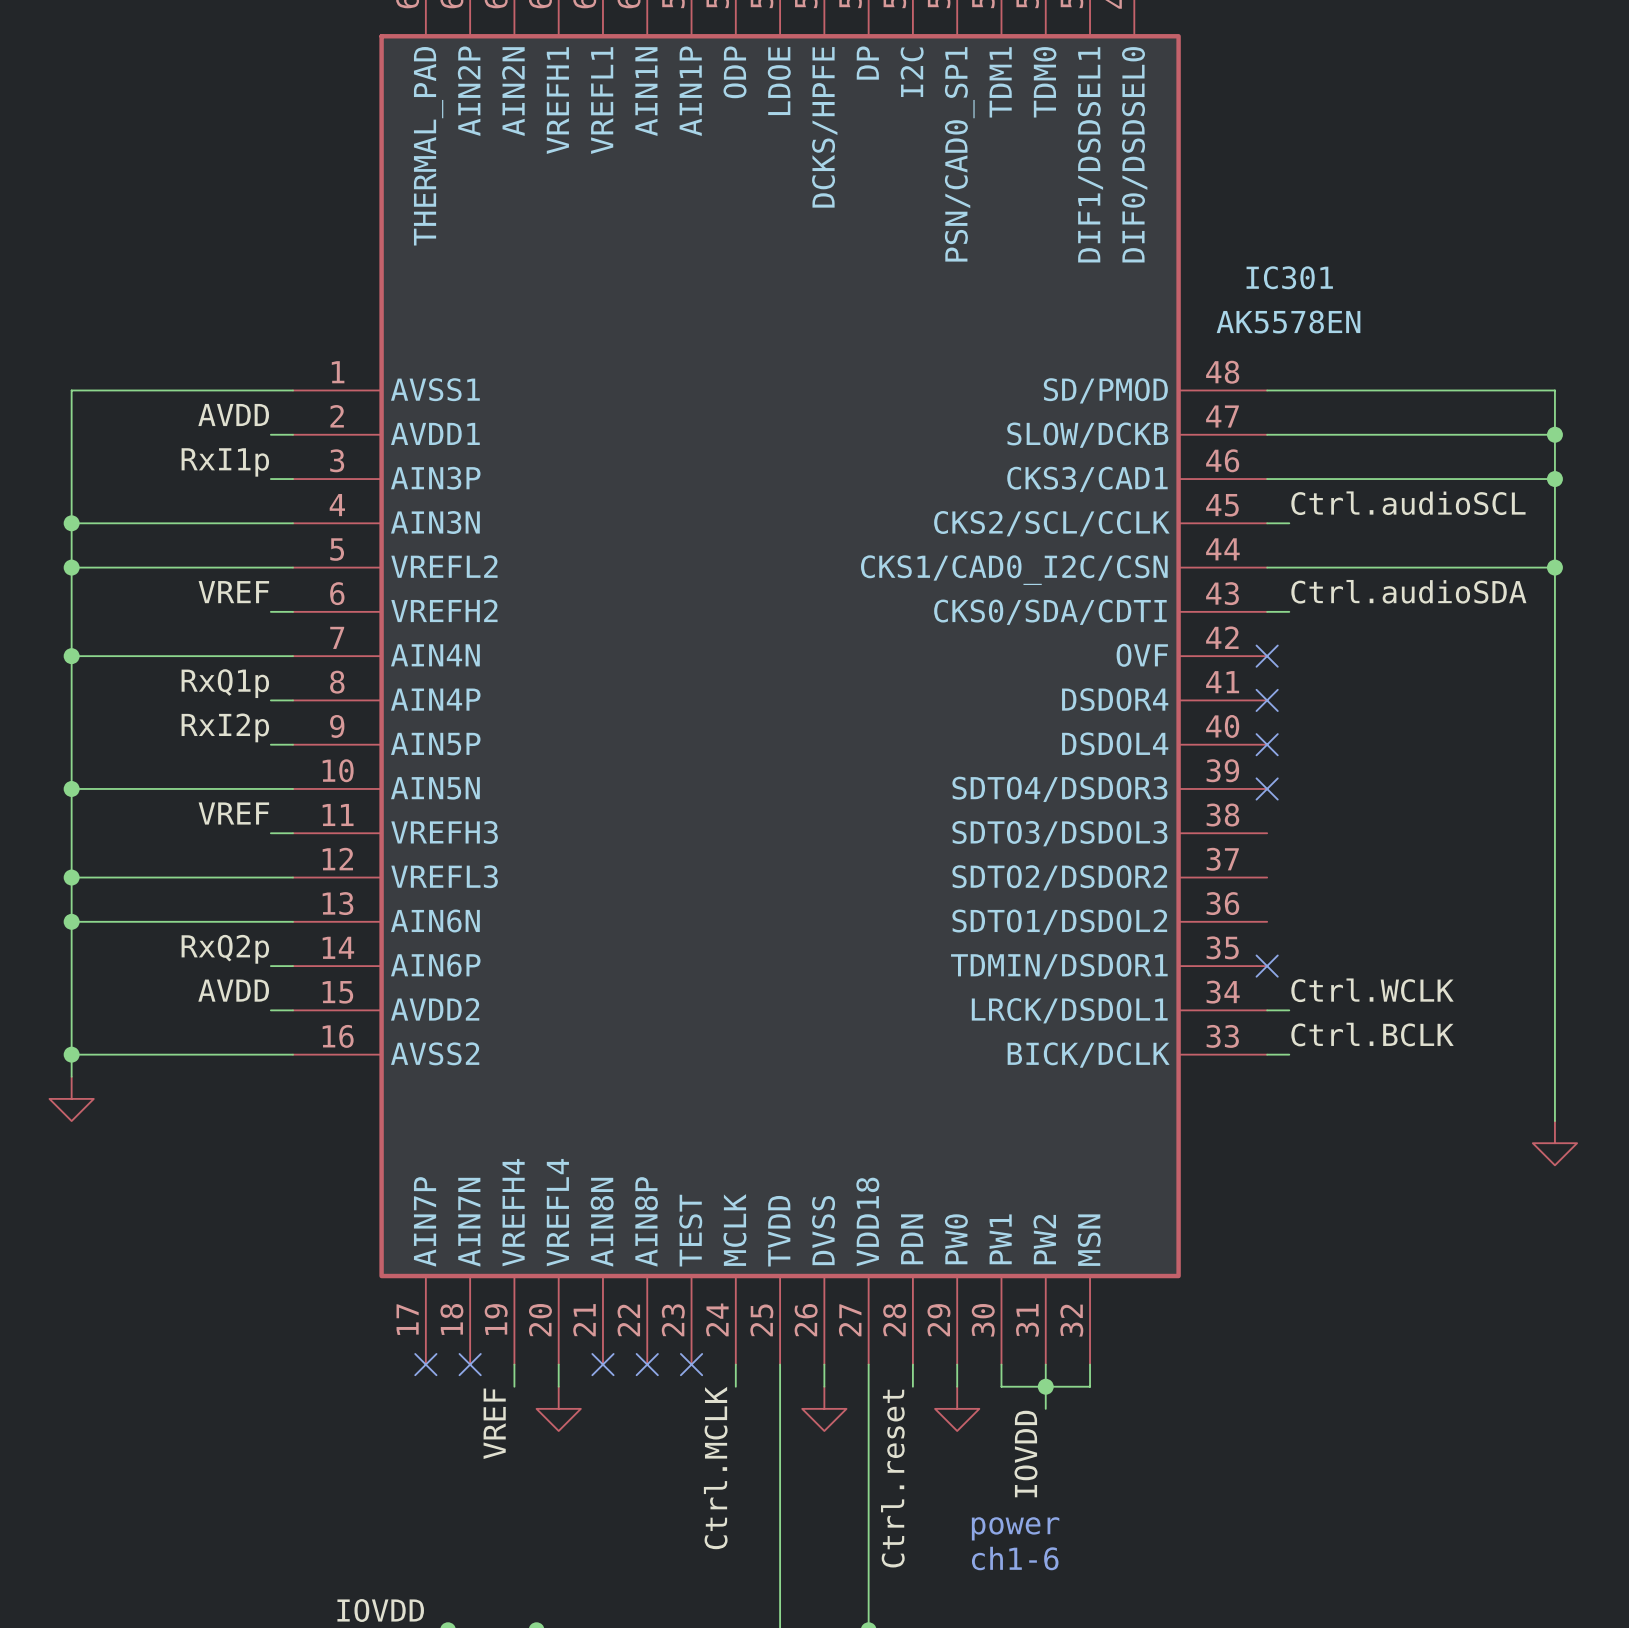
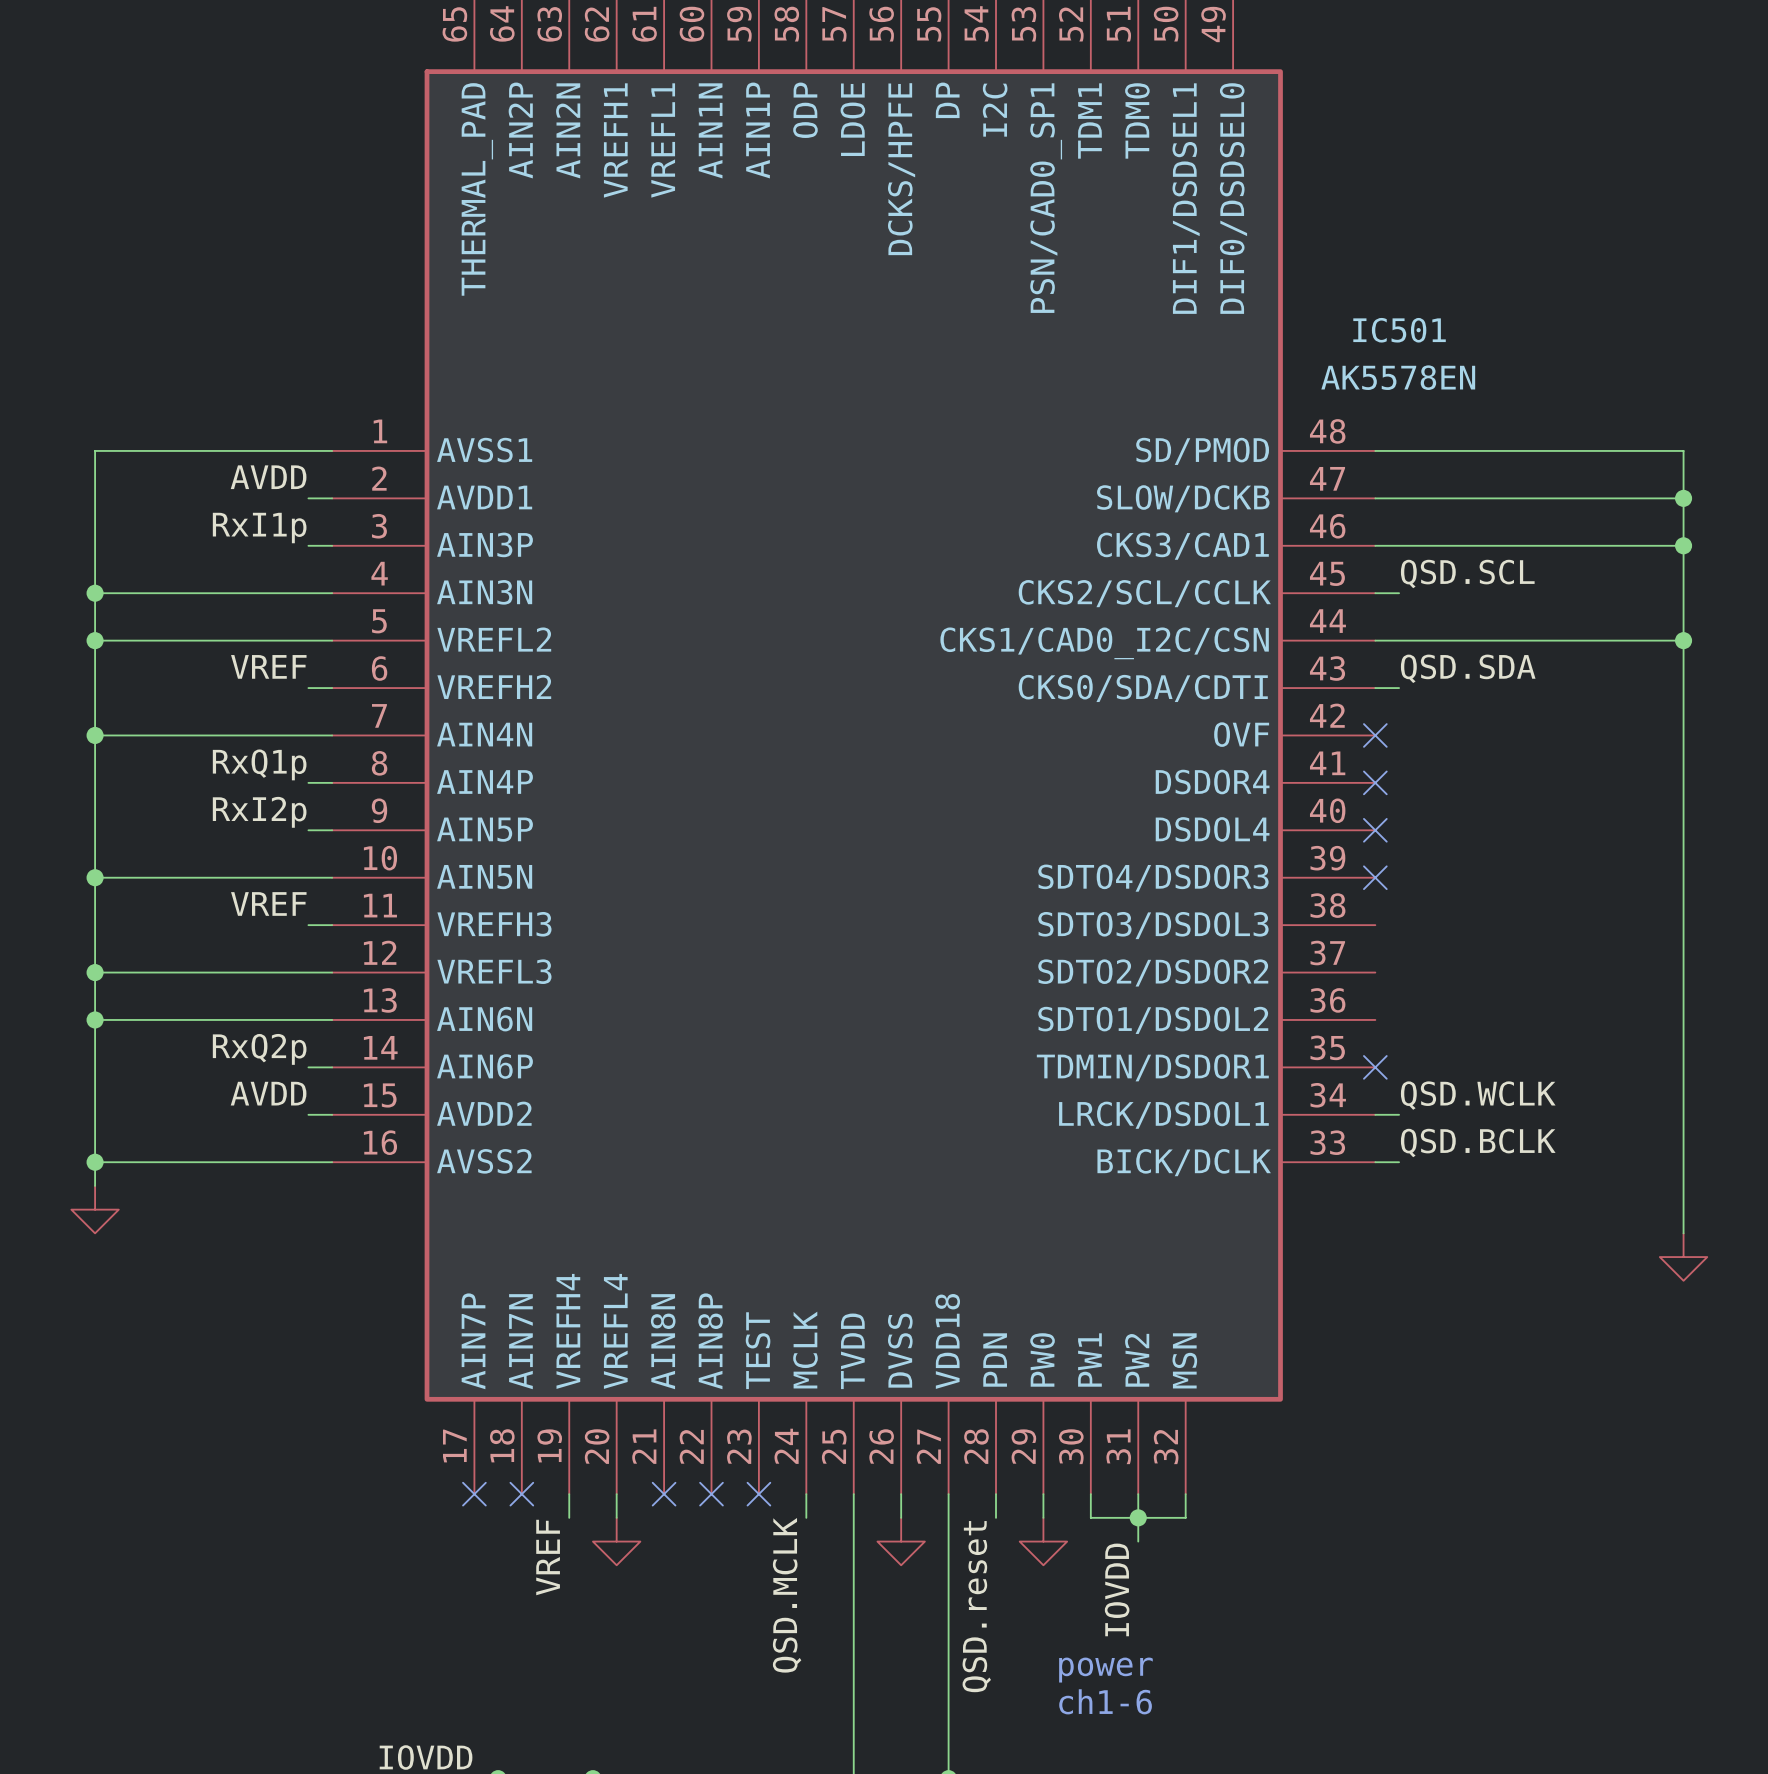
IC301 name: IC301 (1289, 277) -> IC501 (1399, 330)
label: Ctrl.audioSCL (1408, 503) -> QSD.SCL (1467, 573)
label: Ctrl.audioSDA (1408, 591) -> QSD.SDA (1468, 668)
label: Ctrl.WCLK (1372, 990) -> QSD.WCLK (1478, 1095)
label: Ctrl.BCLK (1372, 1034) -> QSD.BCLK (1478, 1143)
label: Ctrl.MCLK (715, 1468) -> QSD.MCLK (787, 1595)
label: Ctrl.reset (892, 1478) -> QSD.reset (976, 1606)

